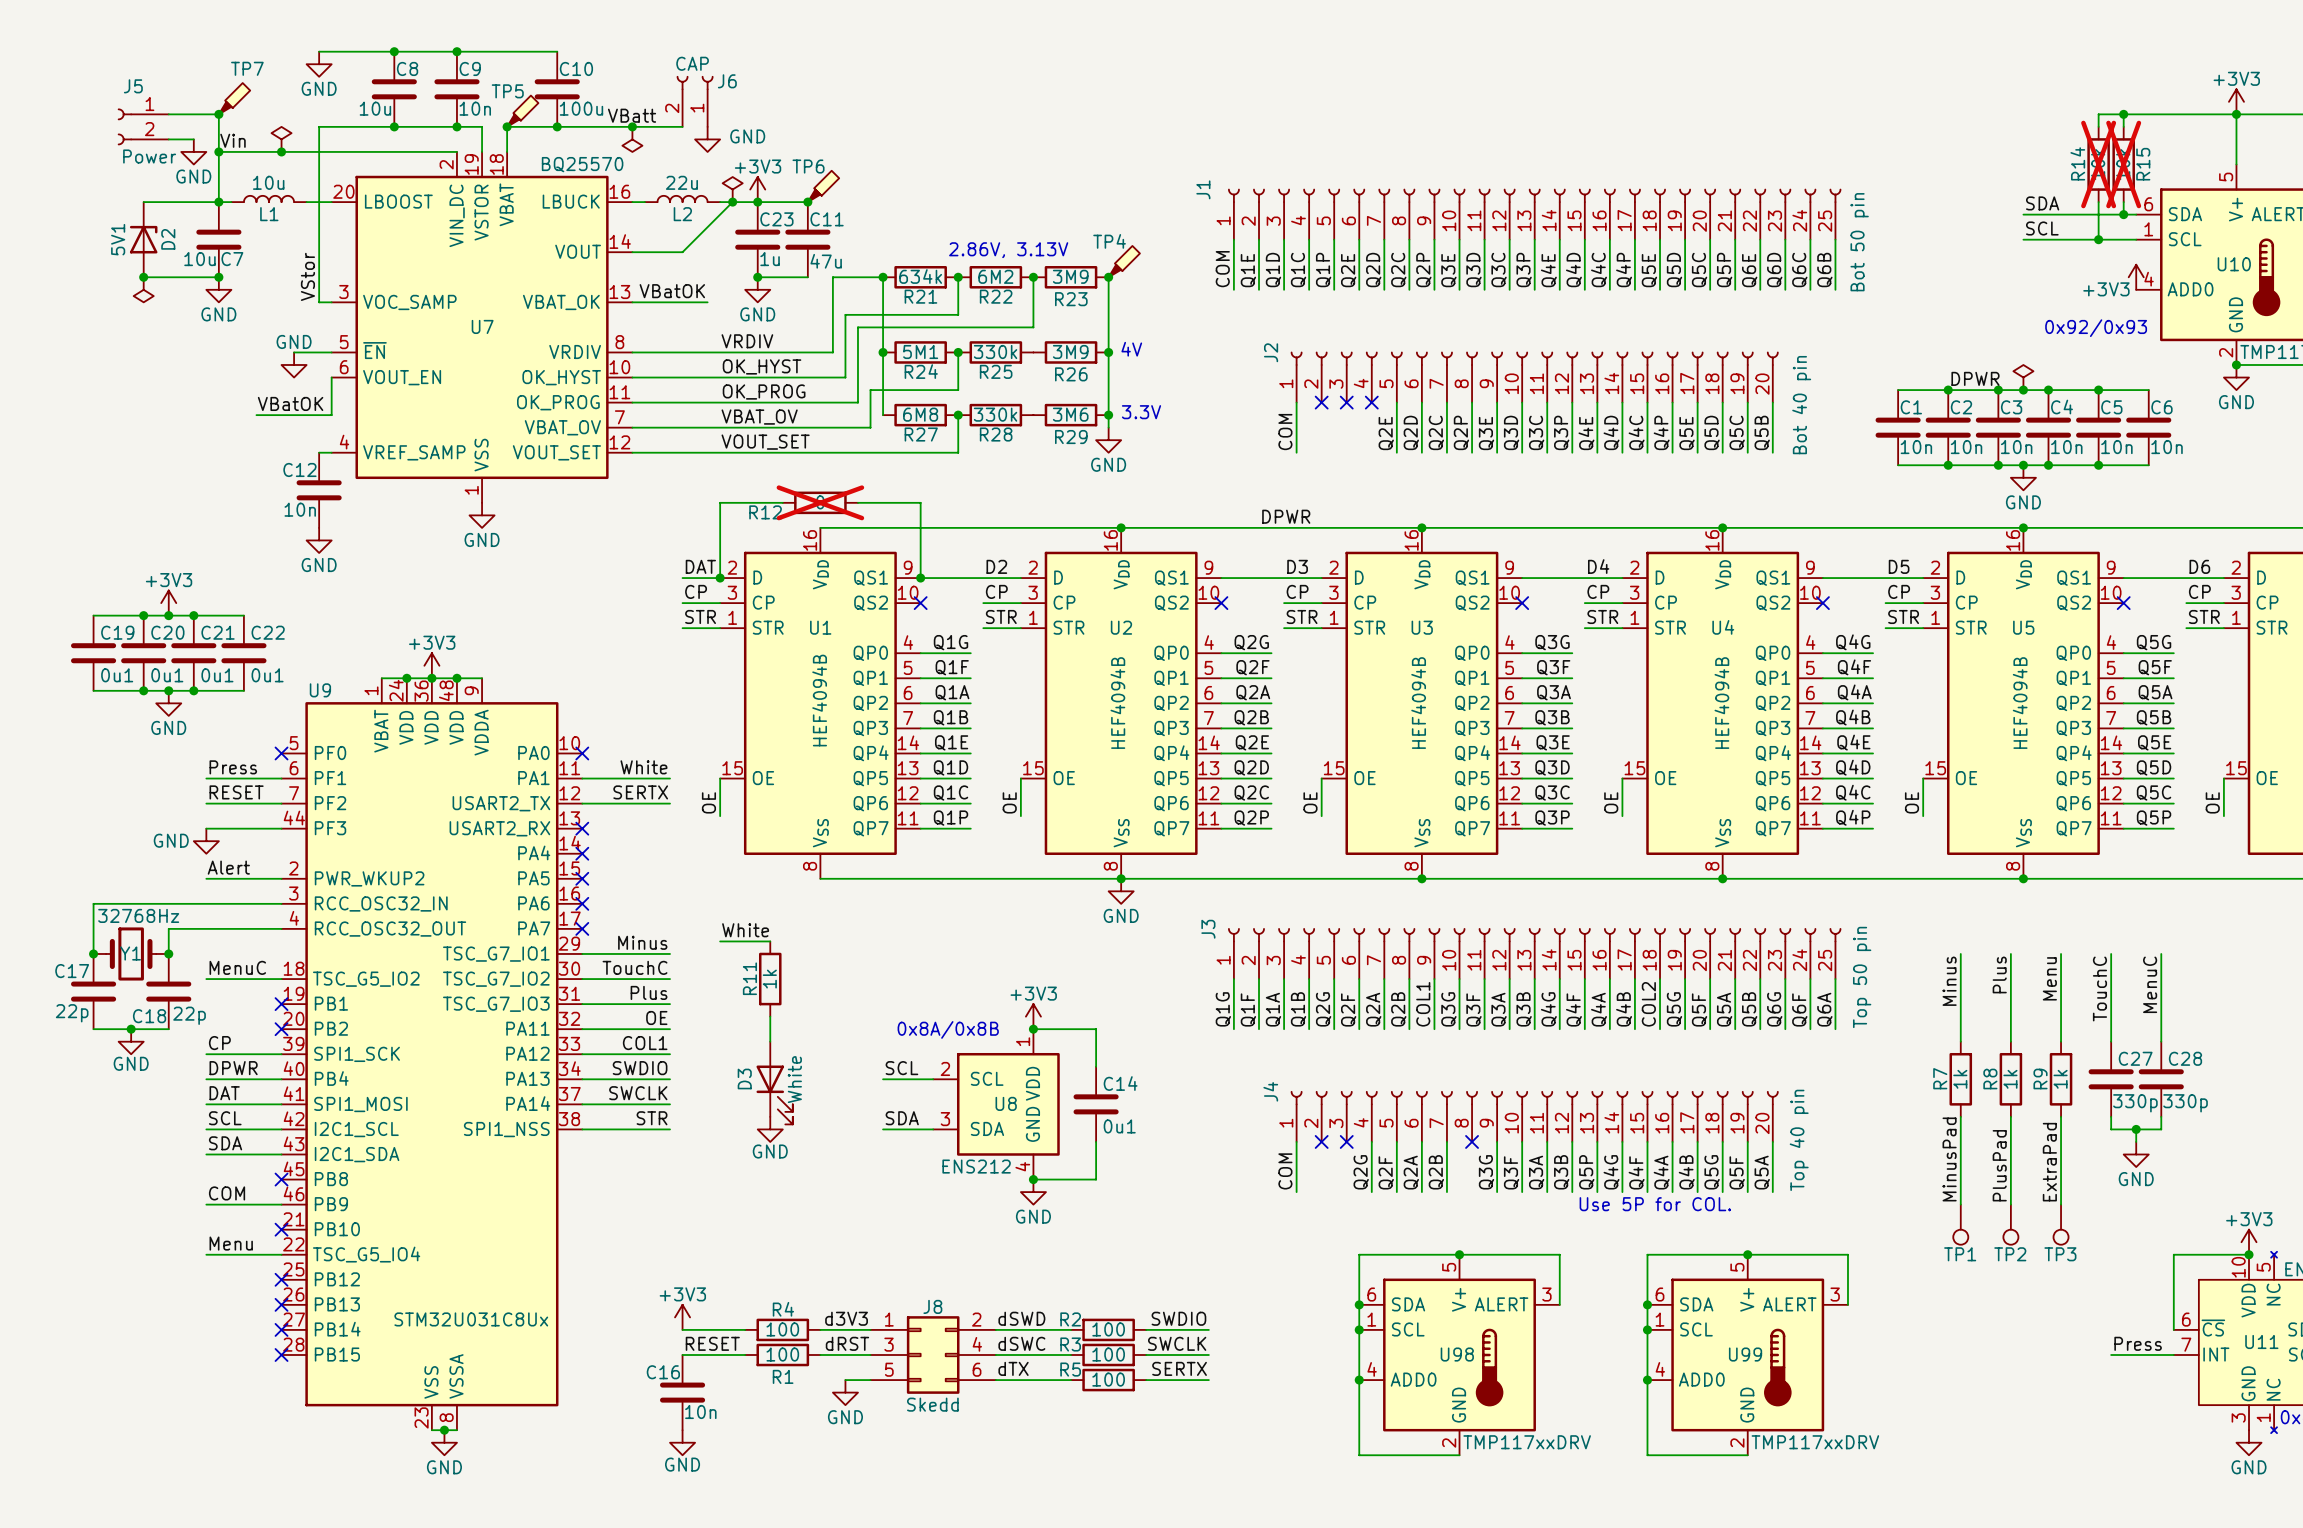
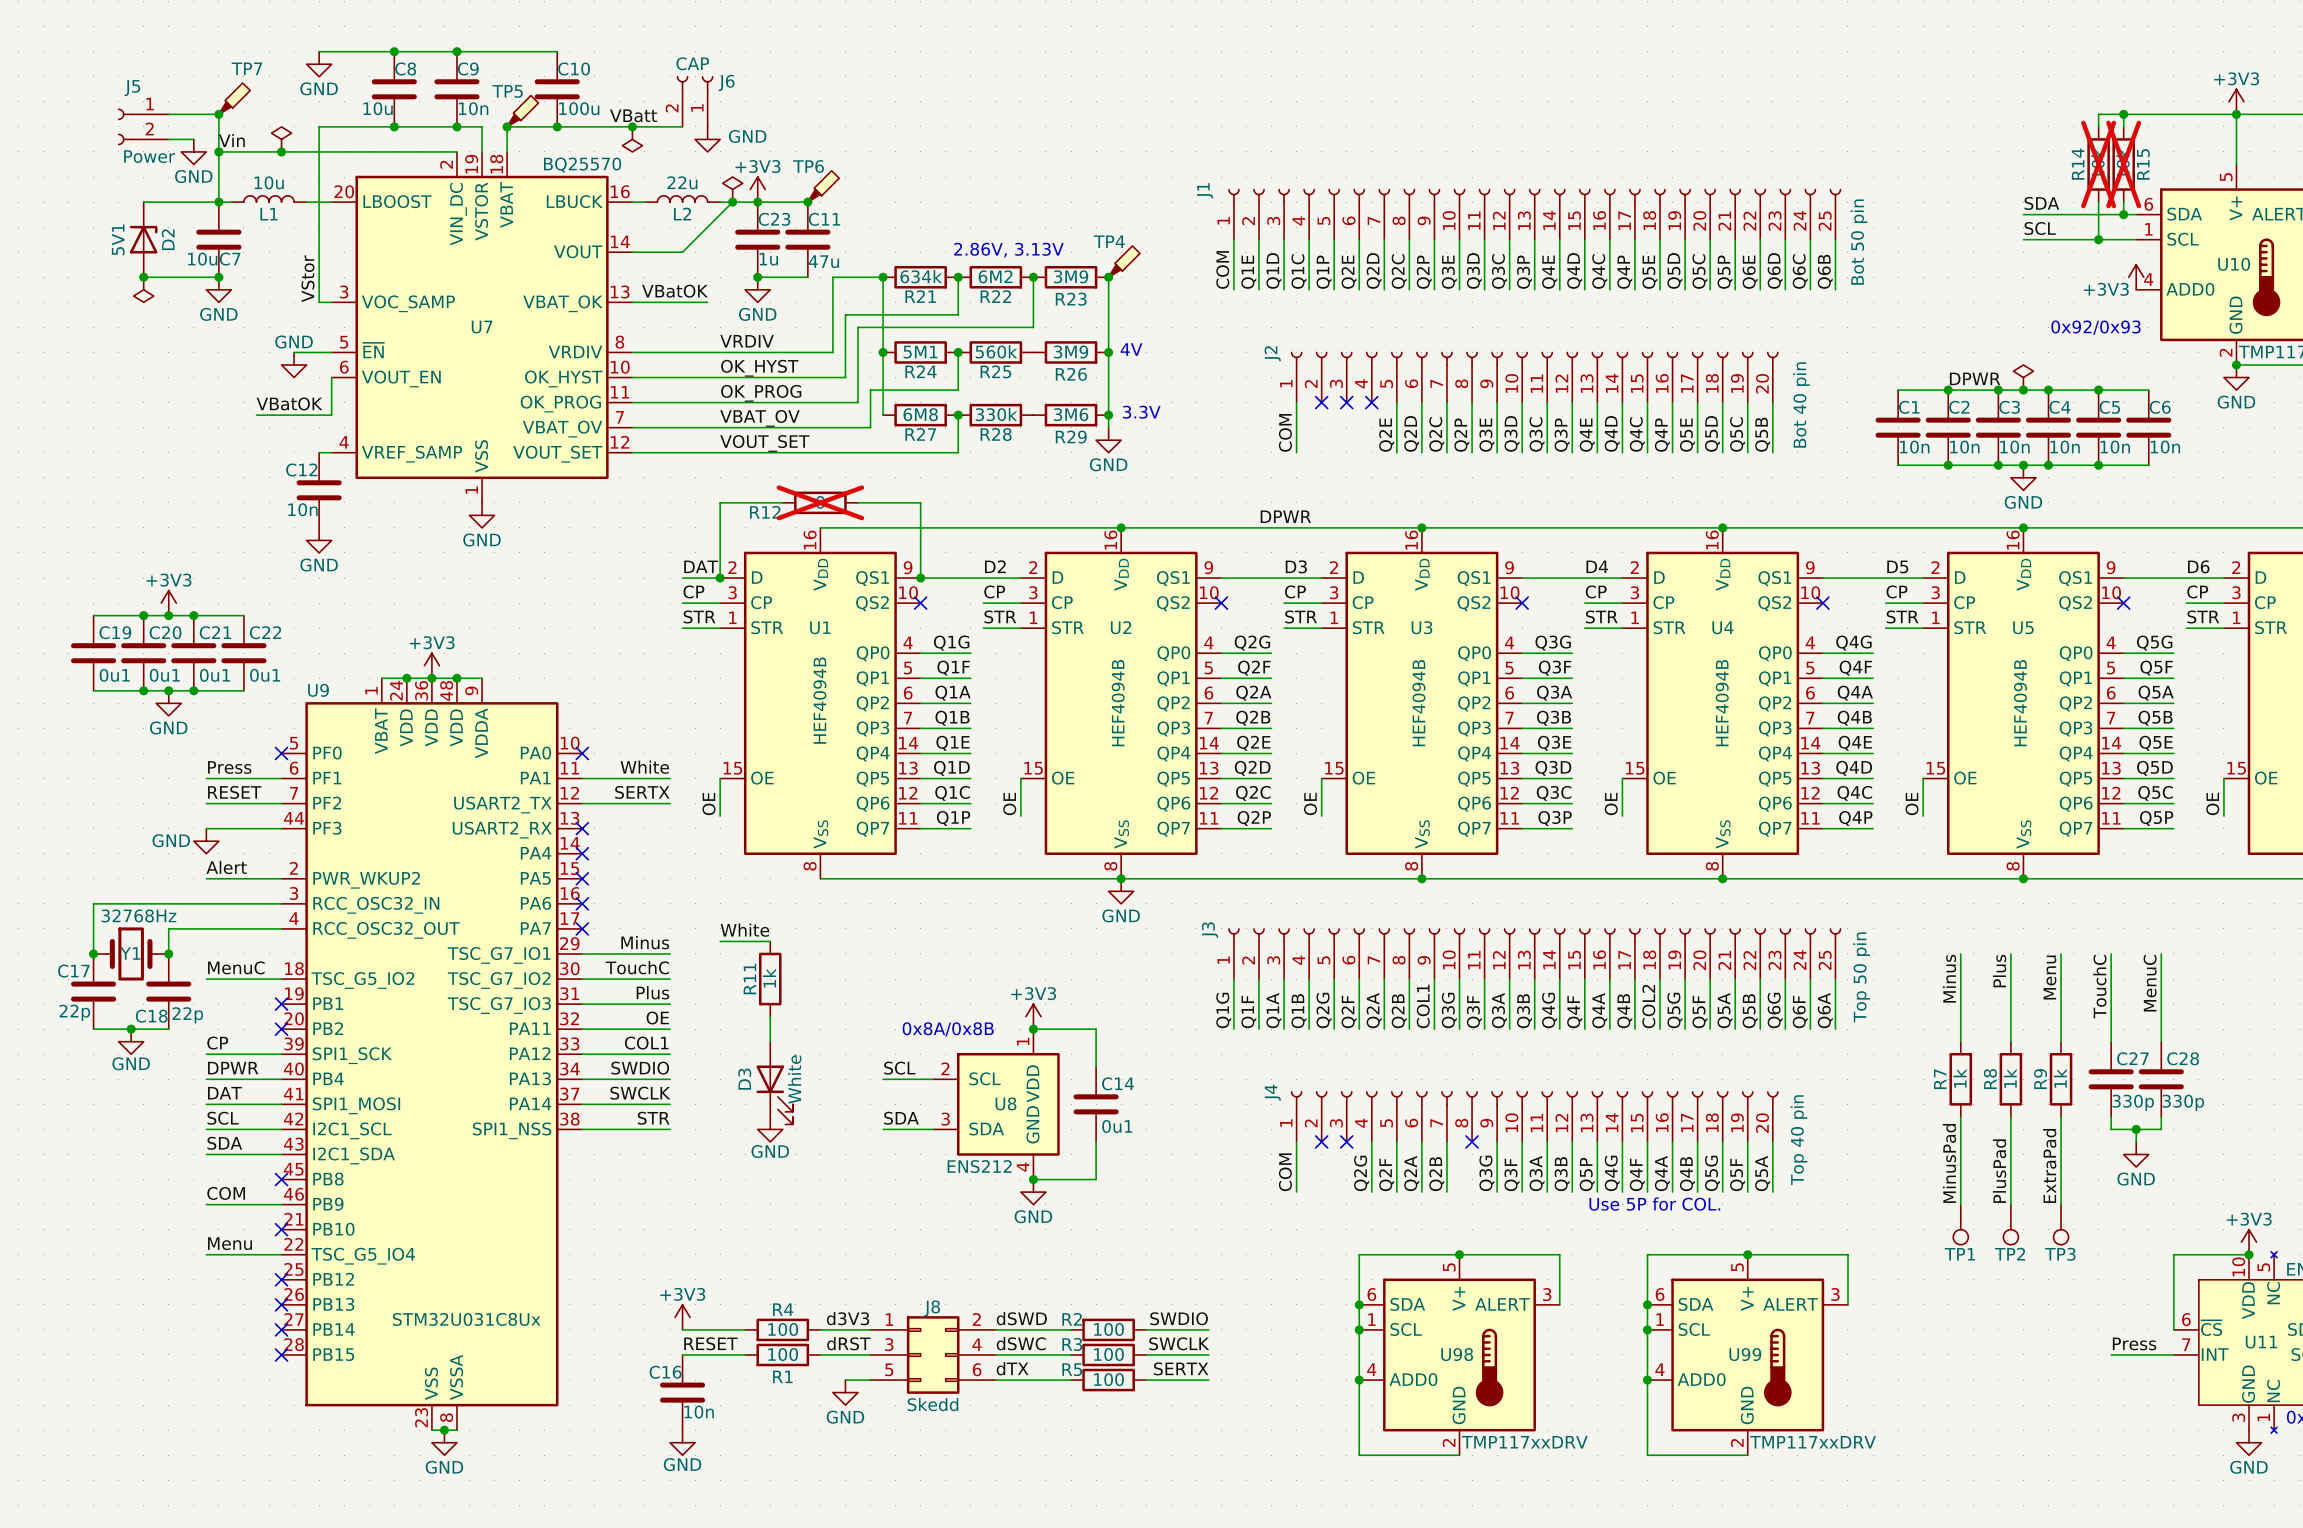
R25 value: 330k (995, 351) -> 560k (996, 351)

